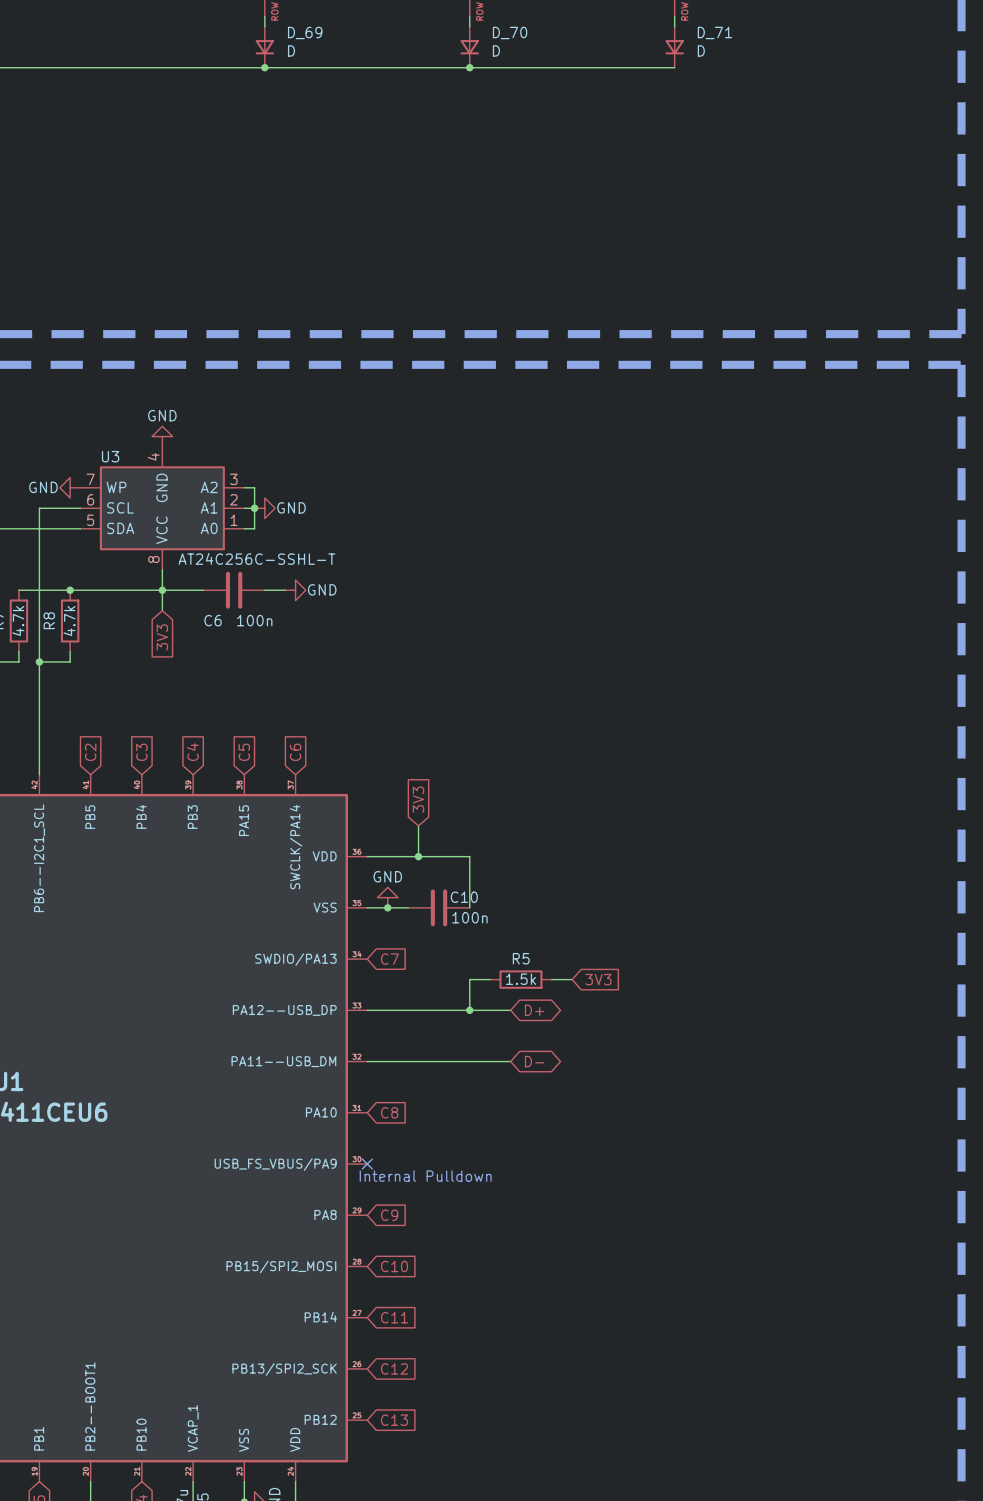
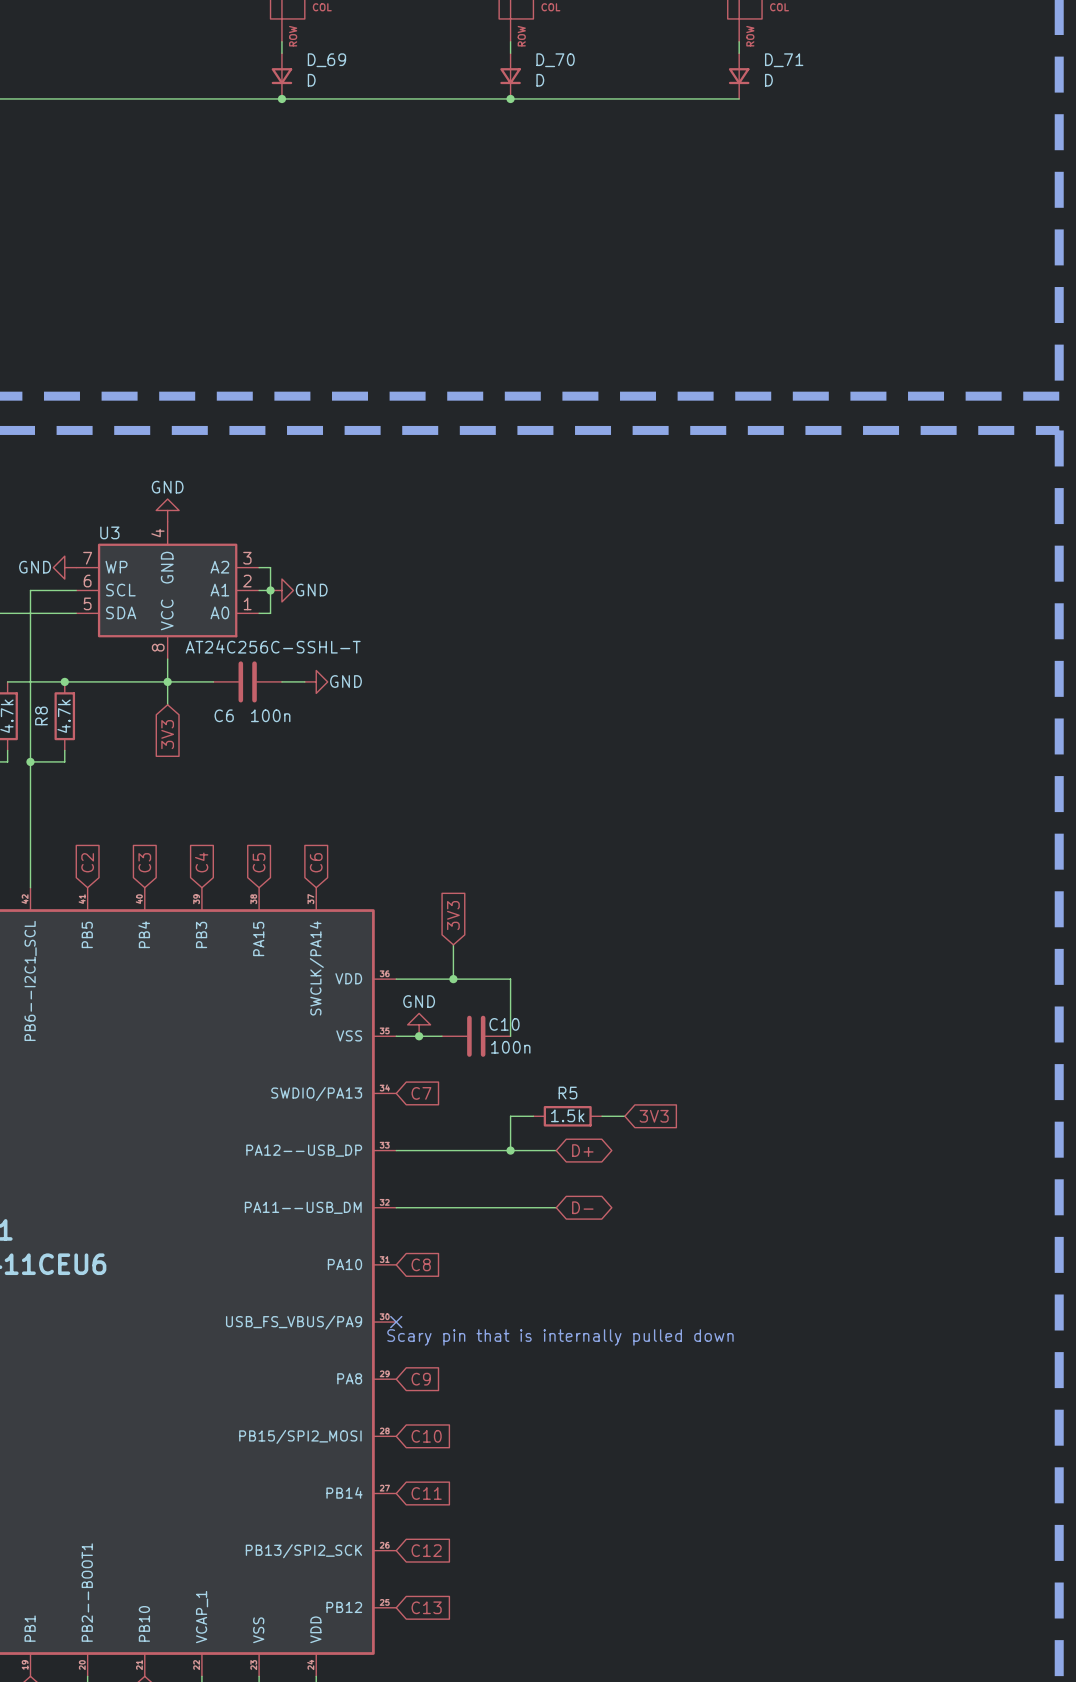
text: Internal Pulldown (425, 1176) -> Scary pin that is internally pulled down (560, 1337)

